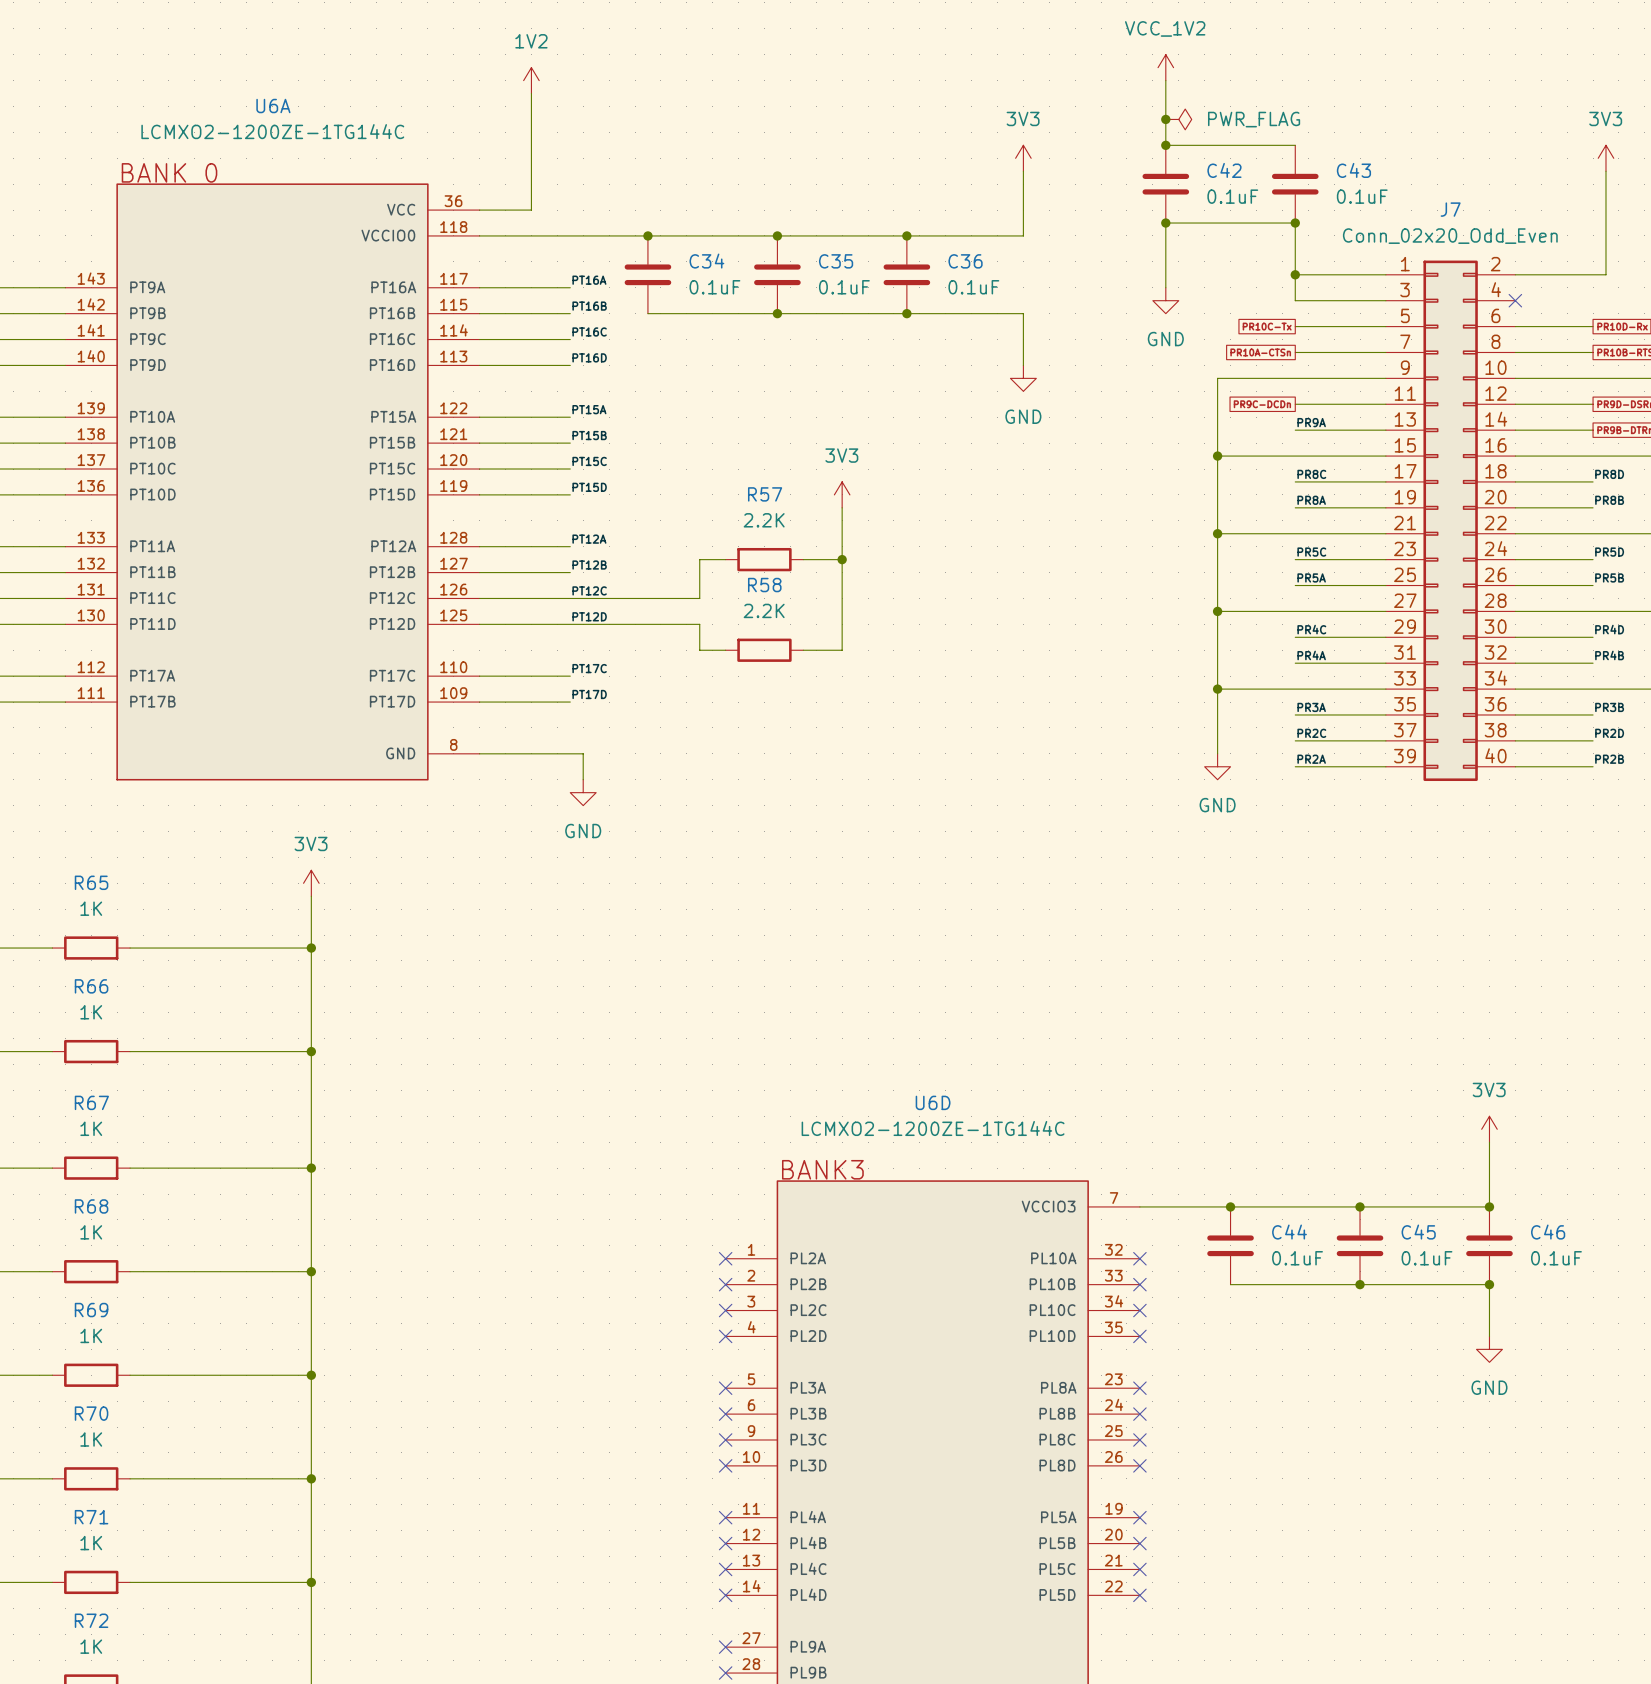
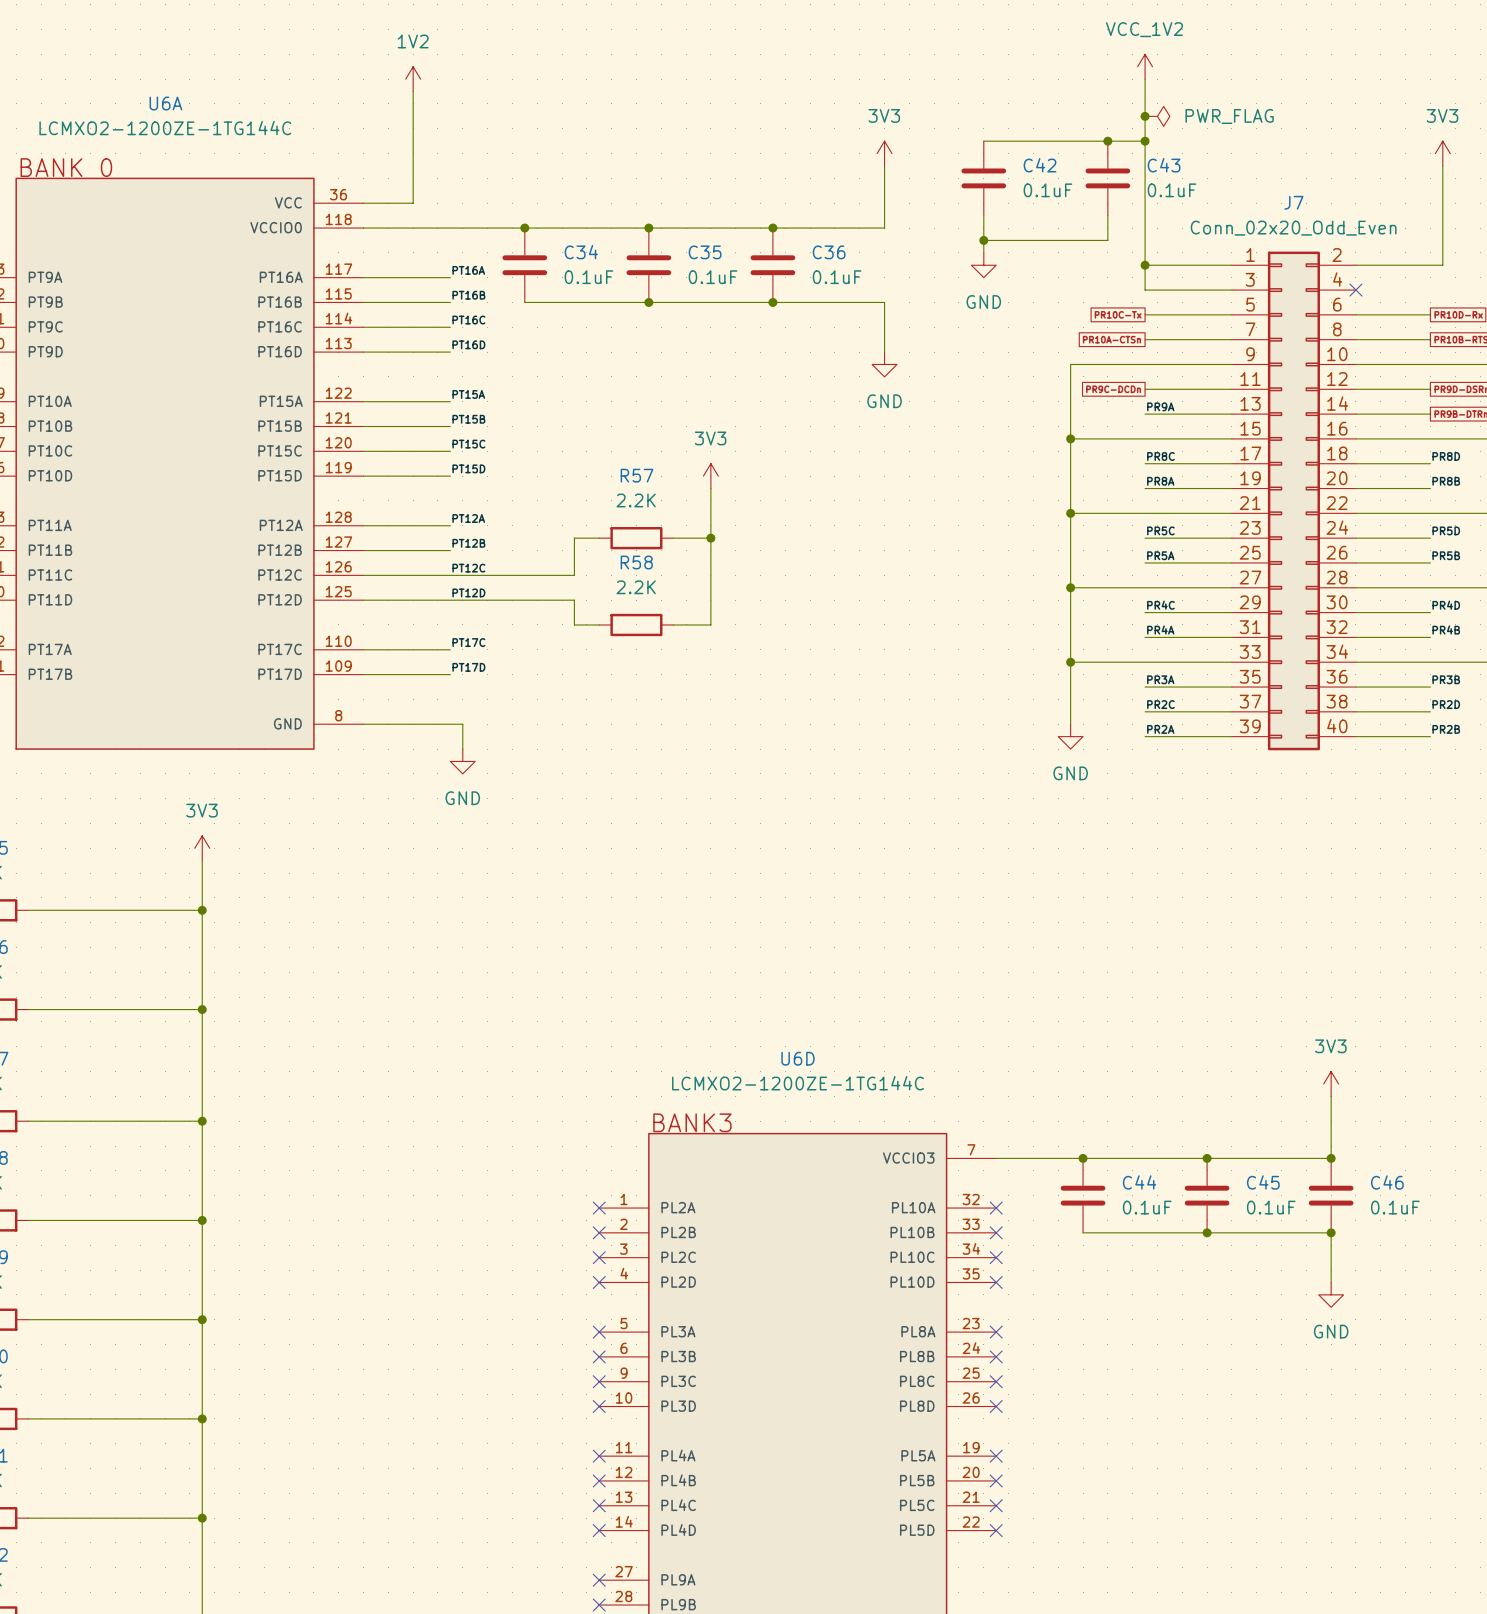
power symbol position: VCC_1V2 (1165, 67) -> VCC_1V2 (1145, 66)
wire: (1165, 80) (1165, 145) -> (983, 141) (1021, 141)
junction: (1165, 119) -> none
power symbol position: PWR_FLAG (1178, 119) -> PWR_FLAG (1157, 116)
junction: none -> (1145, 116)
junction: (1165, 145) -> none
junction: none -> (1107, 141)
junction: none -> (1145, 141)
C42 position: (1165, 184) -> (983, 178)
C43 position: (1295, 184) -> (1107, 178)
wire: none -> (983, 215) (983, 252)
junction position: (1165, 223) -> (983, 240)
wire: none -> (1107, 215) (1107, 240) (983, 240)
wire: (1295, 223) (1165, 223) (1165, 287) -> (1145, 215) (1145, 79)
junction: (1295, 223) -> none
power symbol position: GND (1165, 300) -> GND (983, 265)

